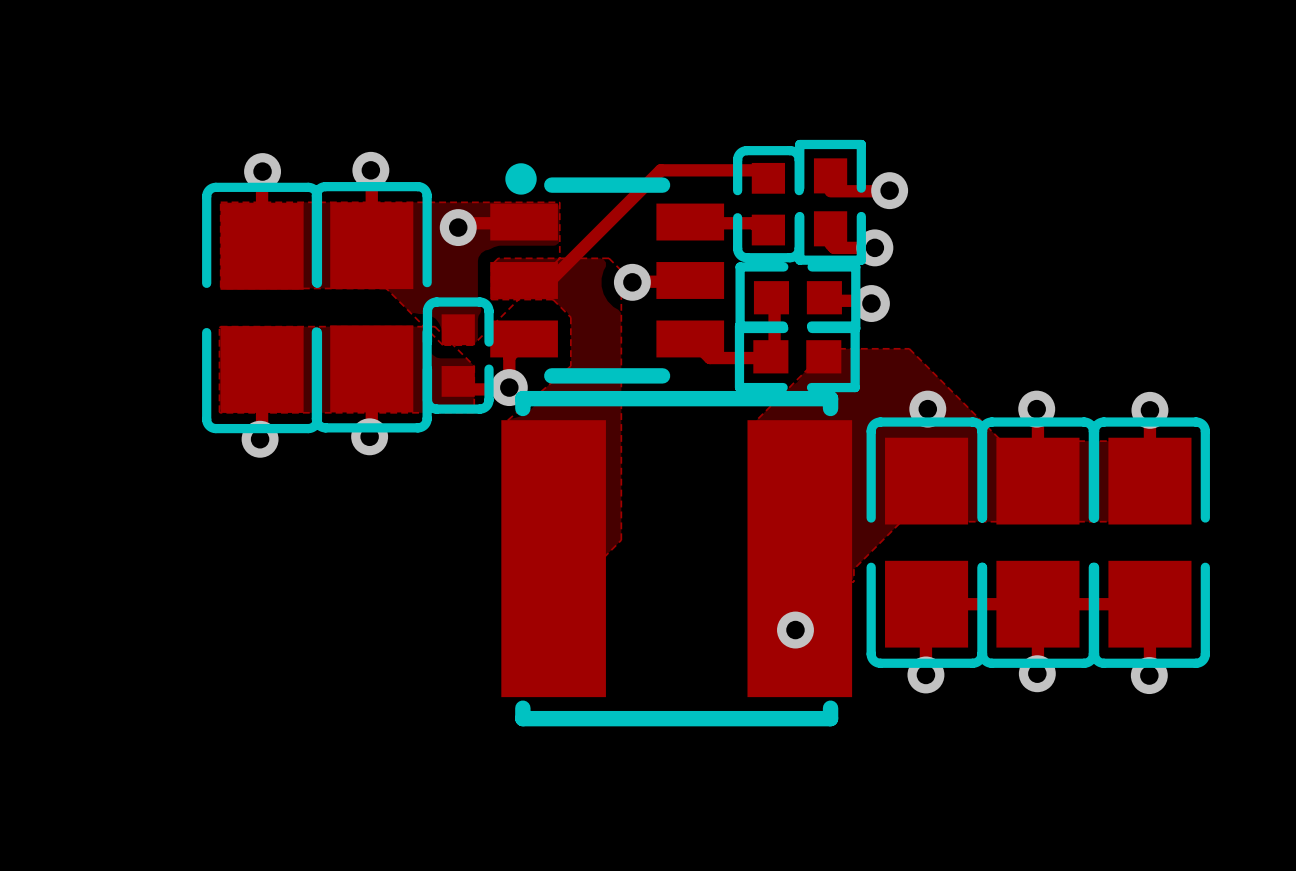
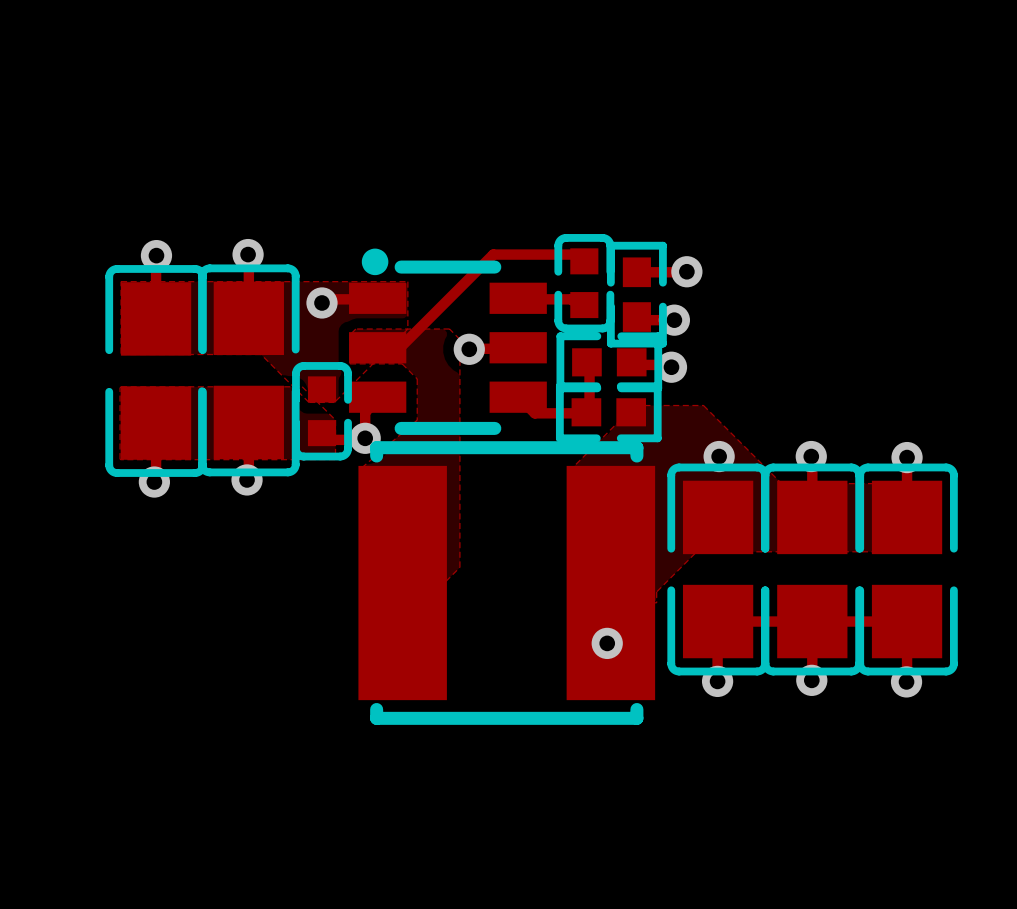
part position: (830, 202) -> (636, 294)

